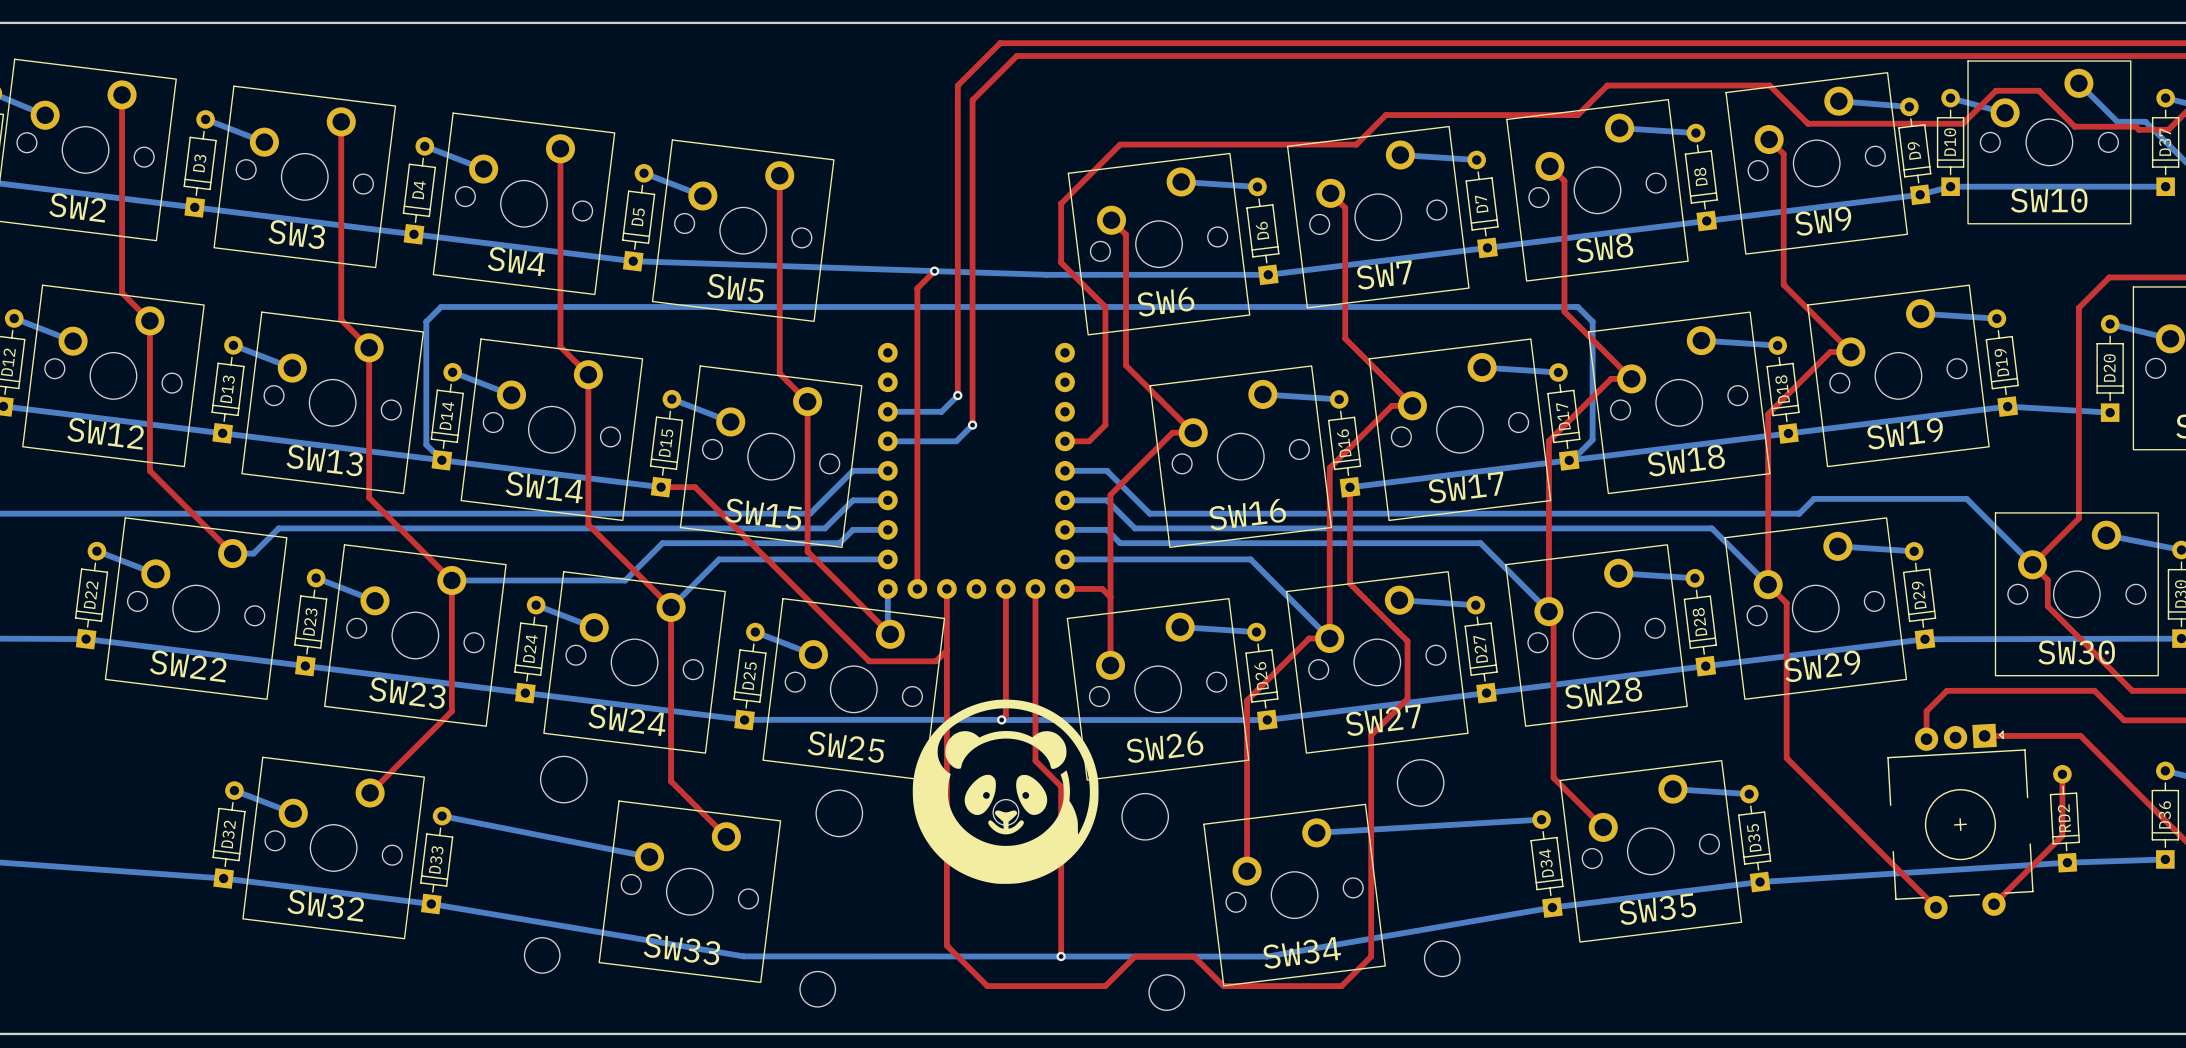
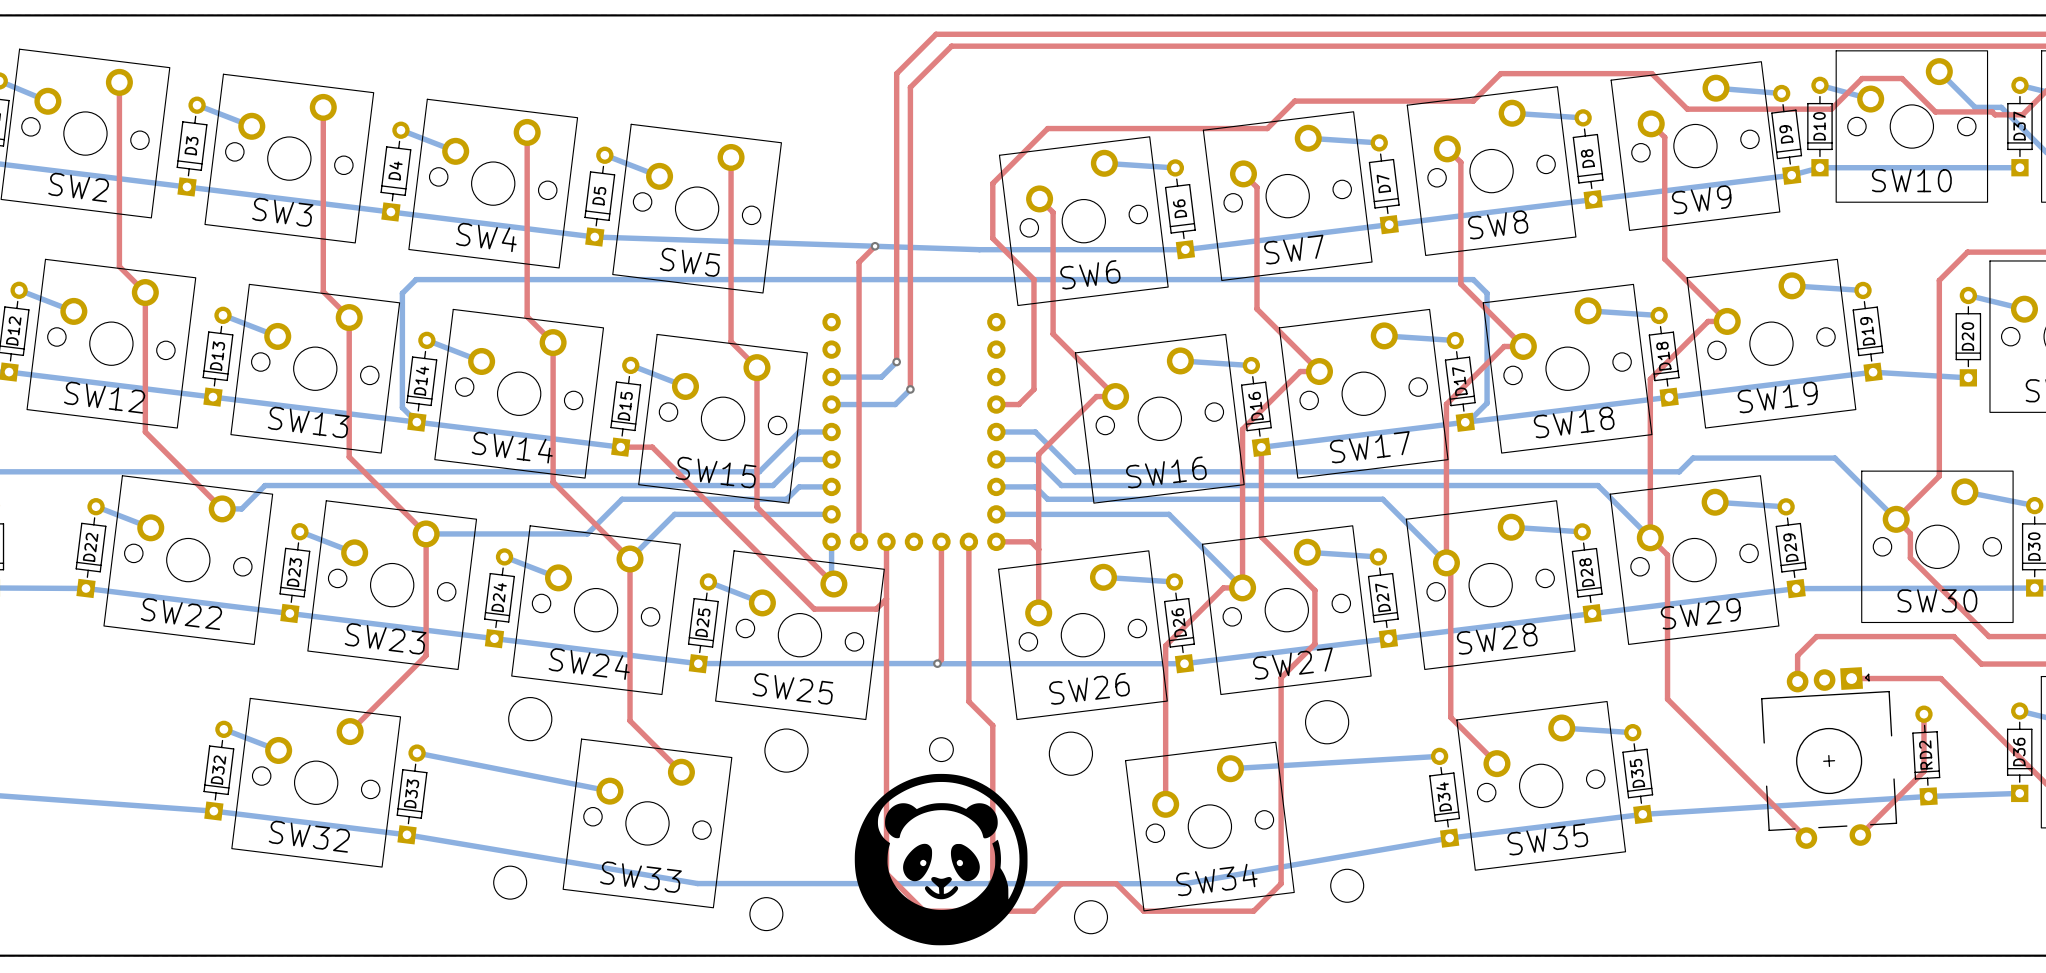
drawing position: (1005, 749) -> (941, 820)
drawing position: (1005, 791) -> (941, 859)
drawing position: (980, 794) -> (917, 862)
drawing position: (1031, 794) -> (965, 862)
drawing position: (1006, 822) -> (941, 888)

